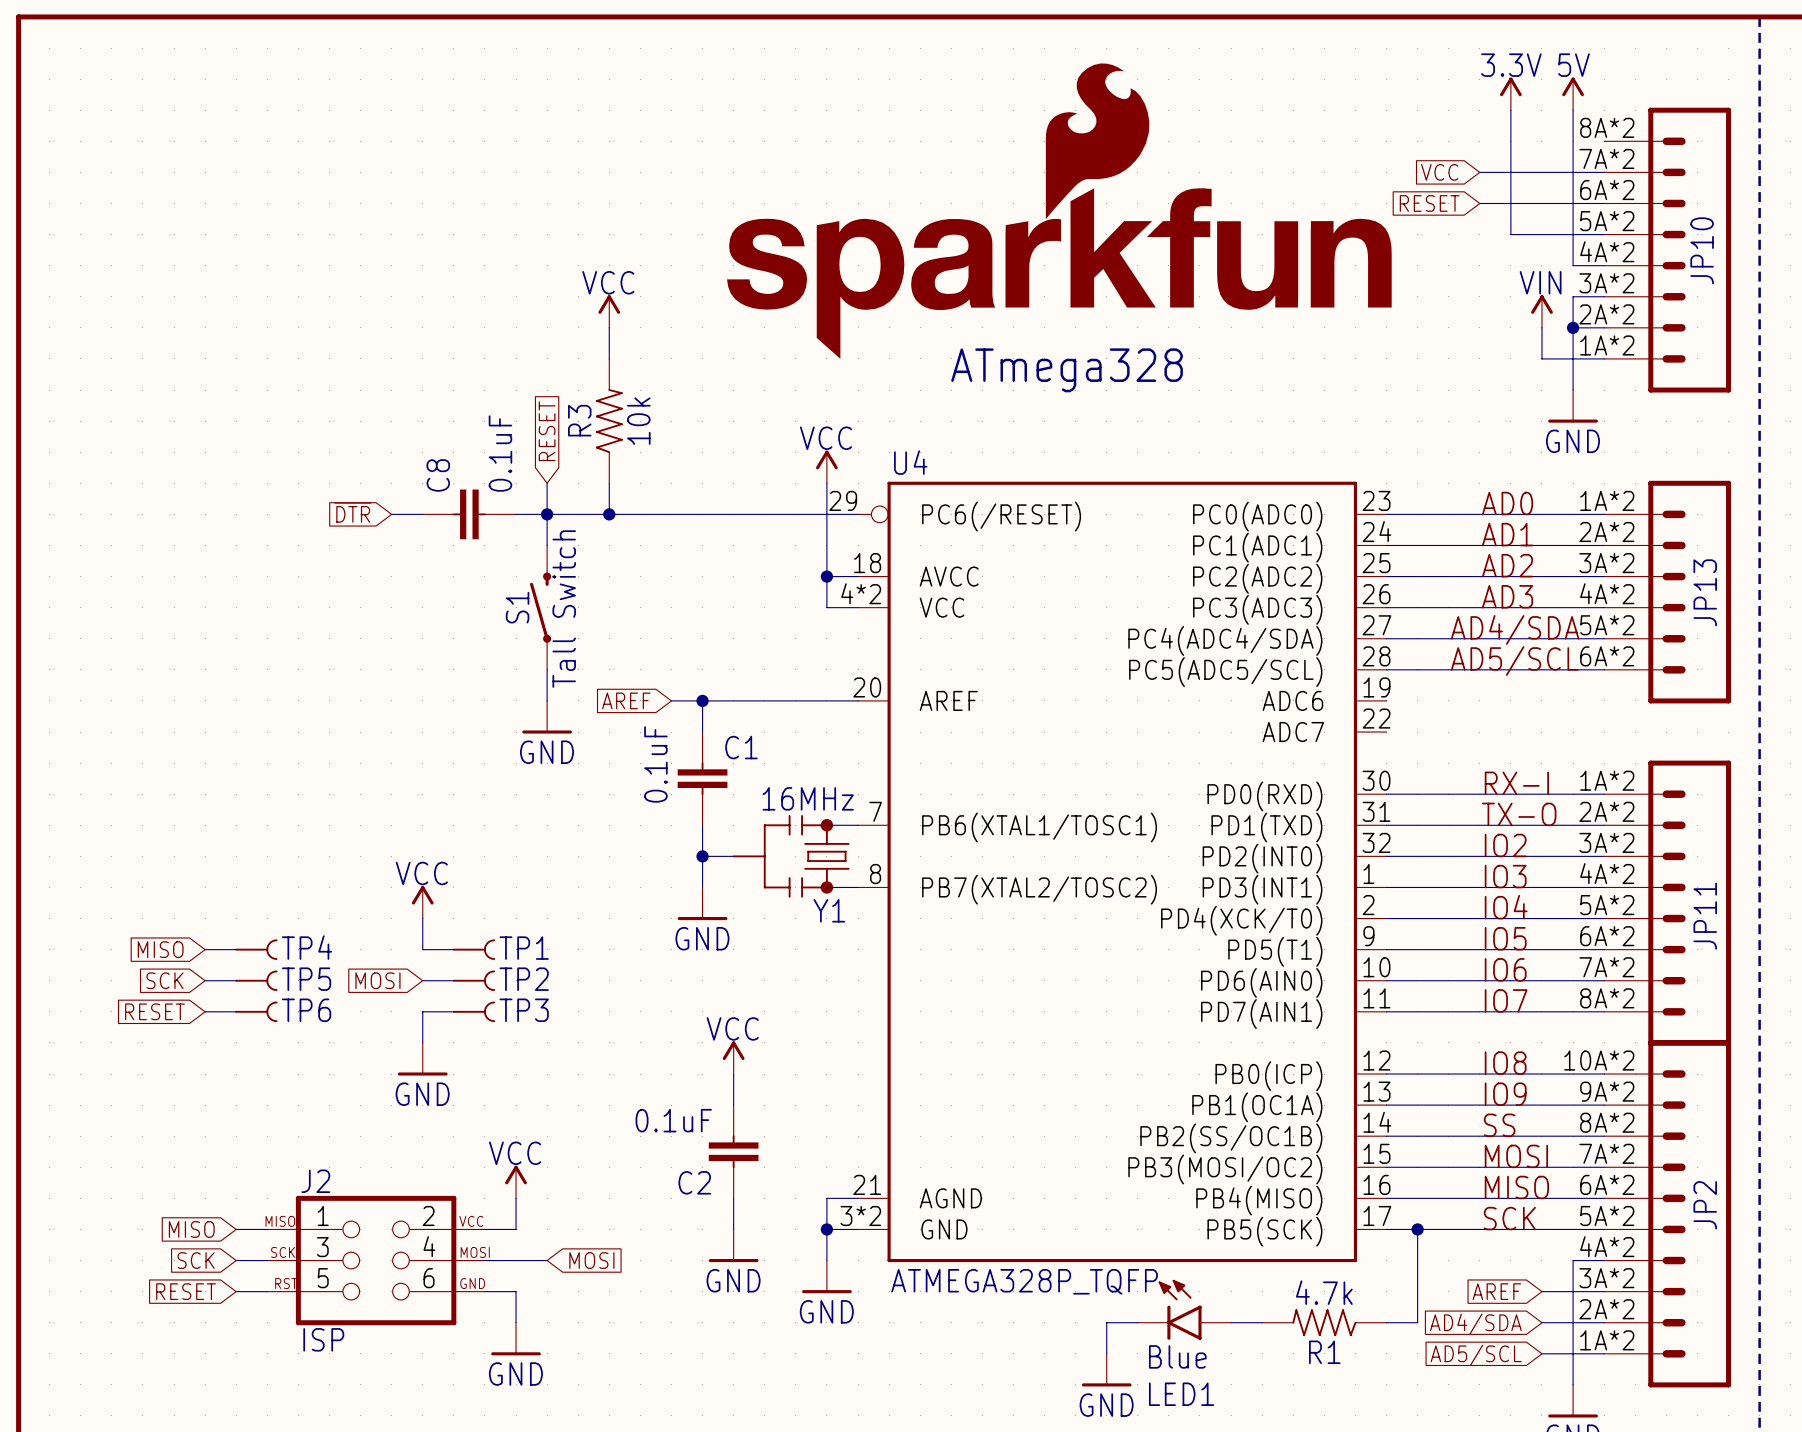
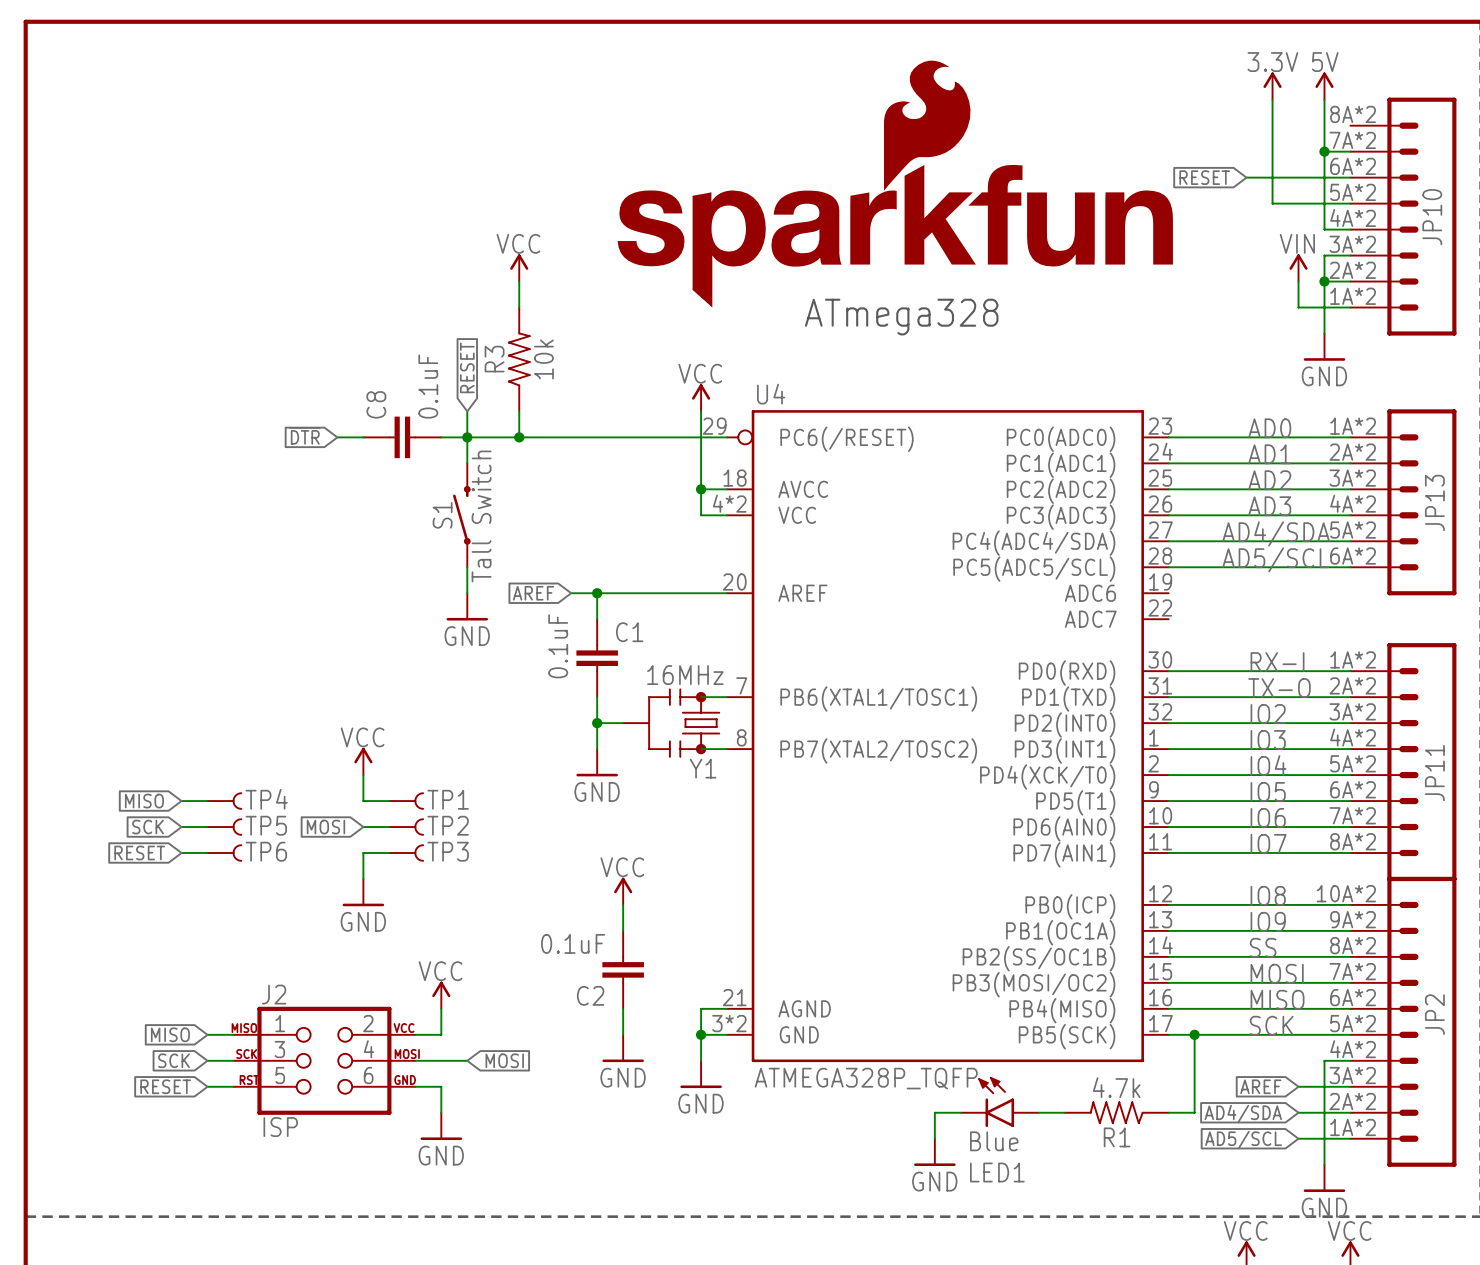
global label: VCC (1439, 172) -> none
wire: (1479, 172) (1573, 172) -> none
junction: none -> (1324, 151)

